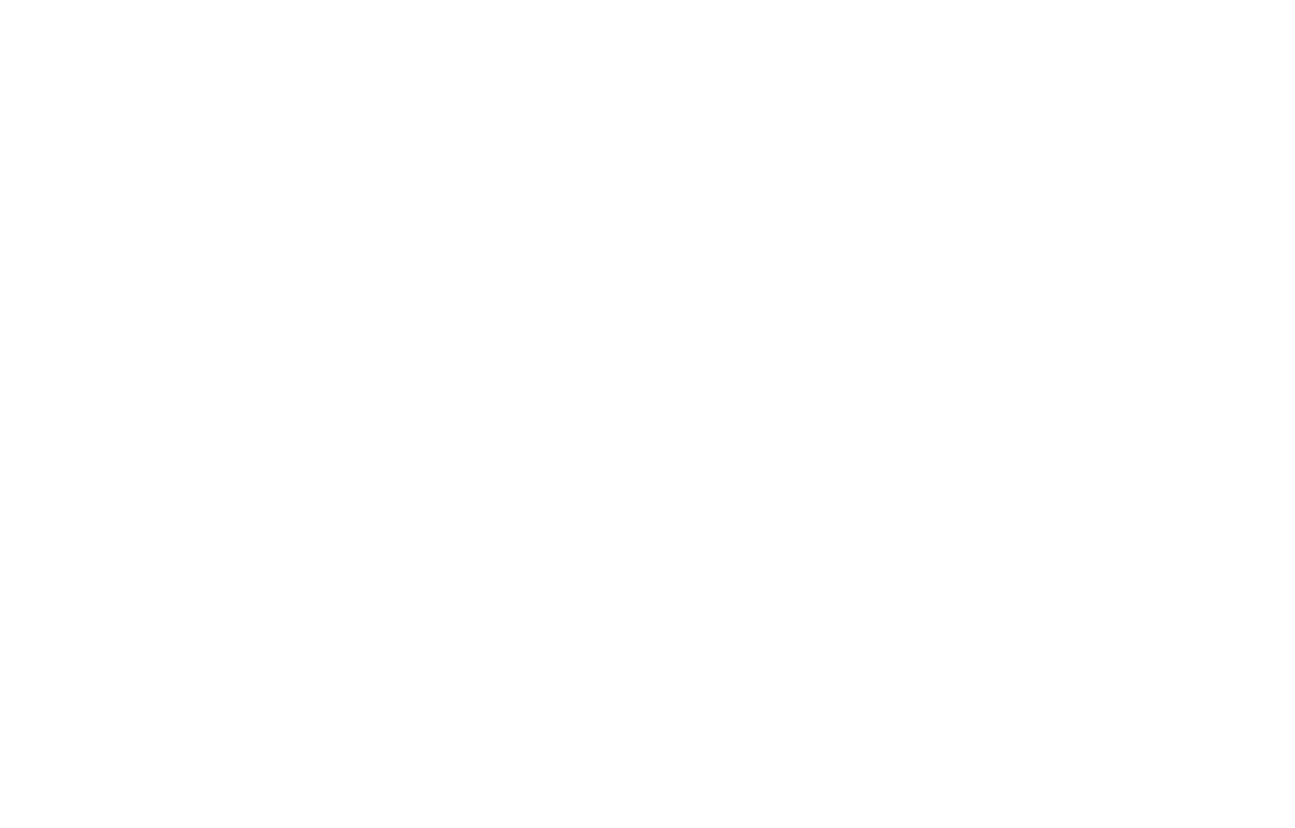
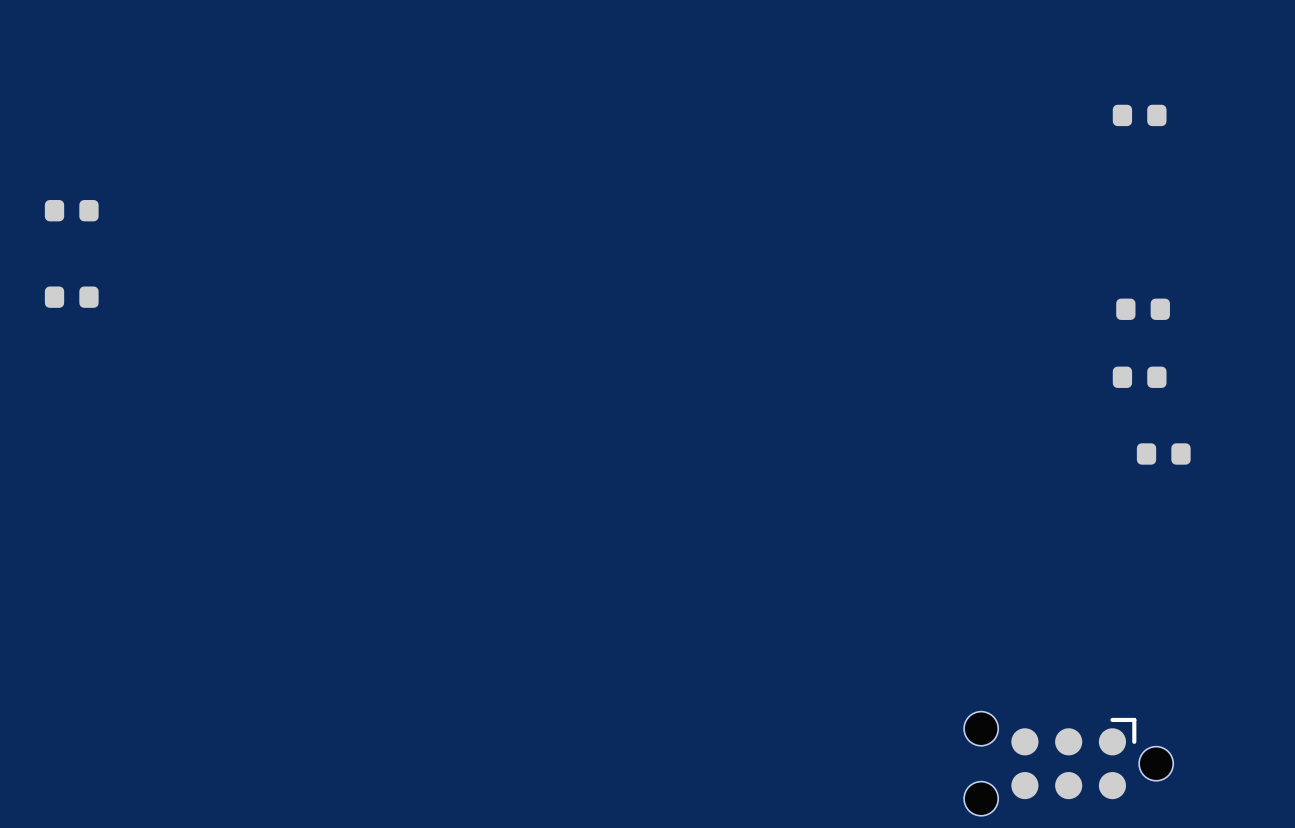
part: none -> (1139, 115)
part: none -> (71, 210)
part: none -> (71, 297)
part: none -> (1143, 309)
part: none -> (1139, 377)
part: none -> (1163, 453)
part: none -> (1068, 763)

